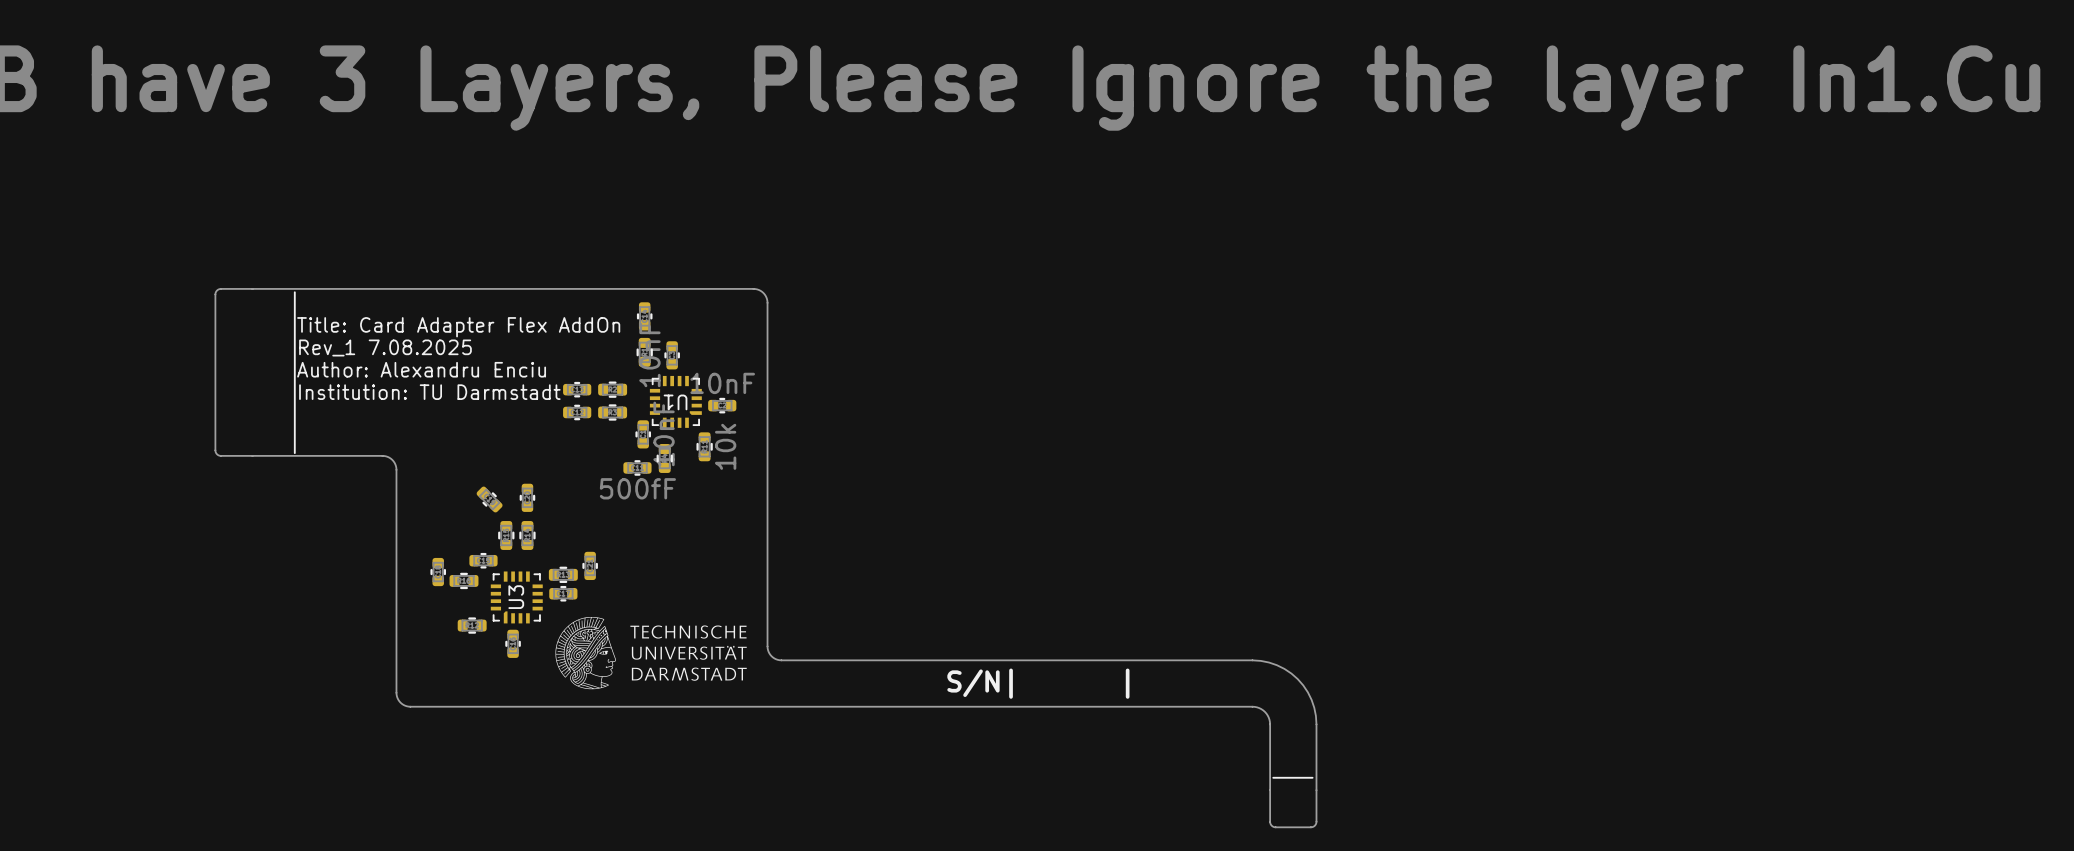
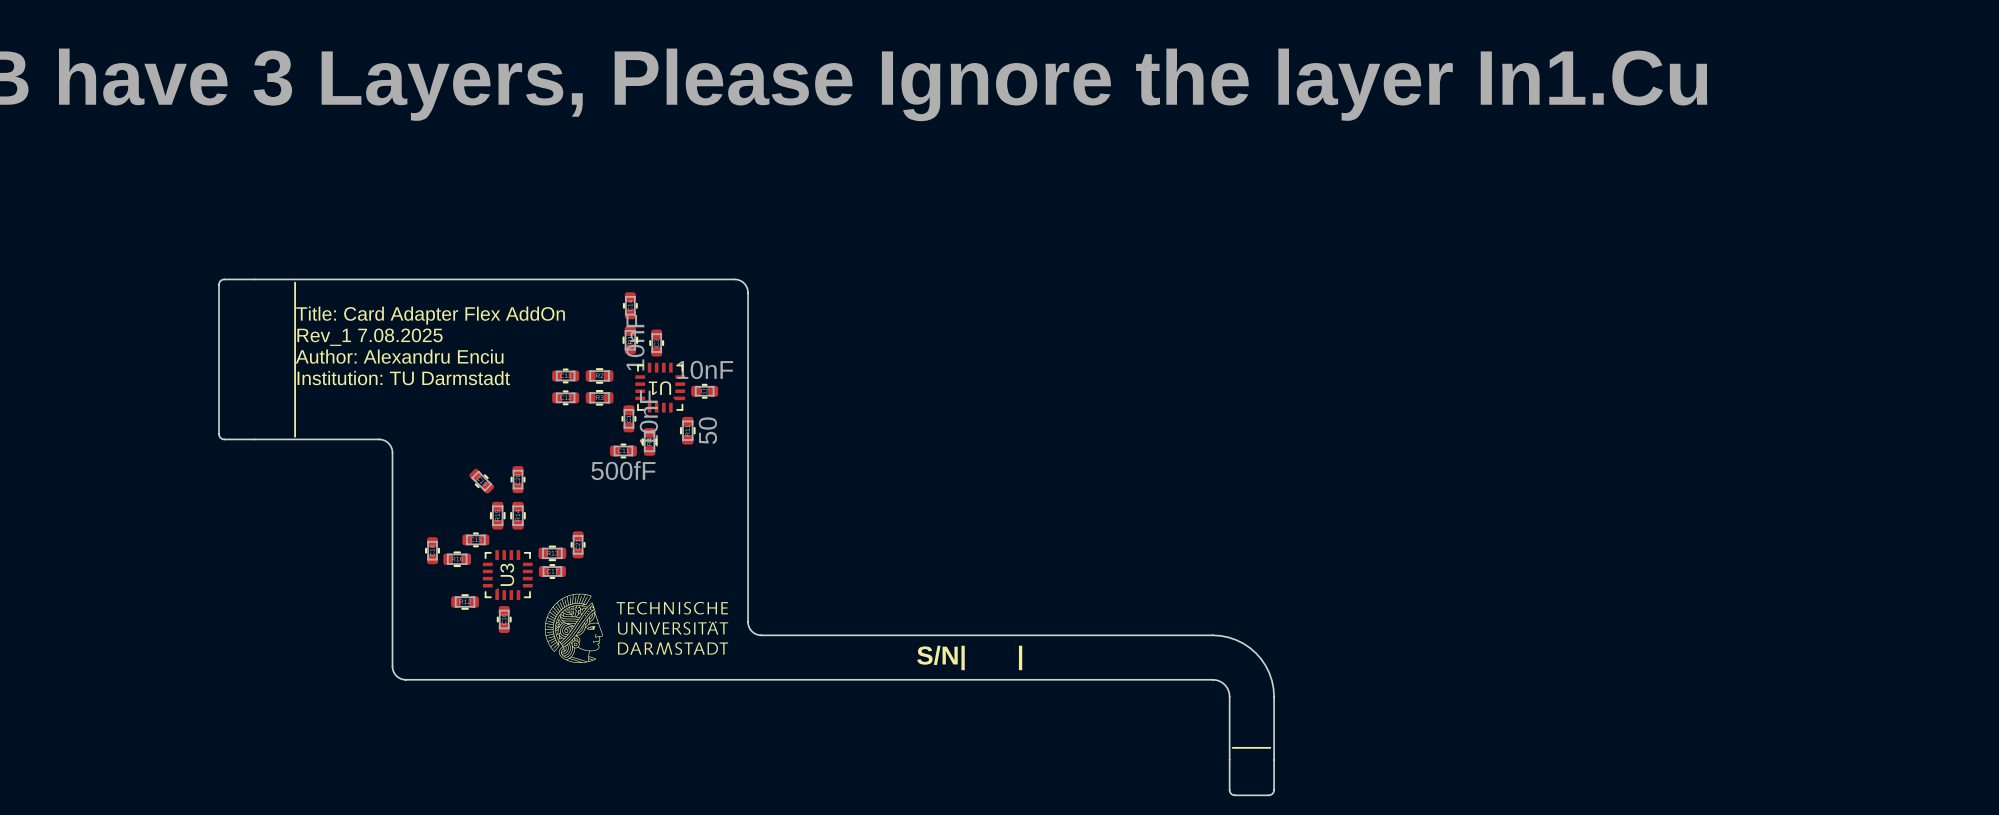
part value: 10k (725, 446) -> 50 (707, 430)

